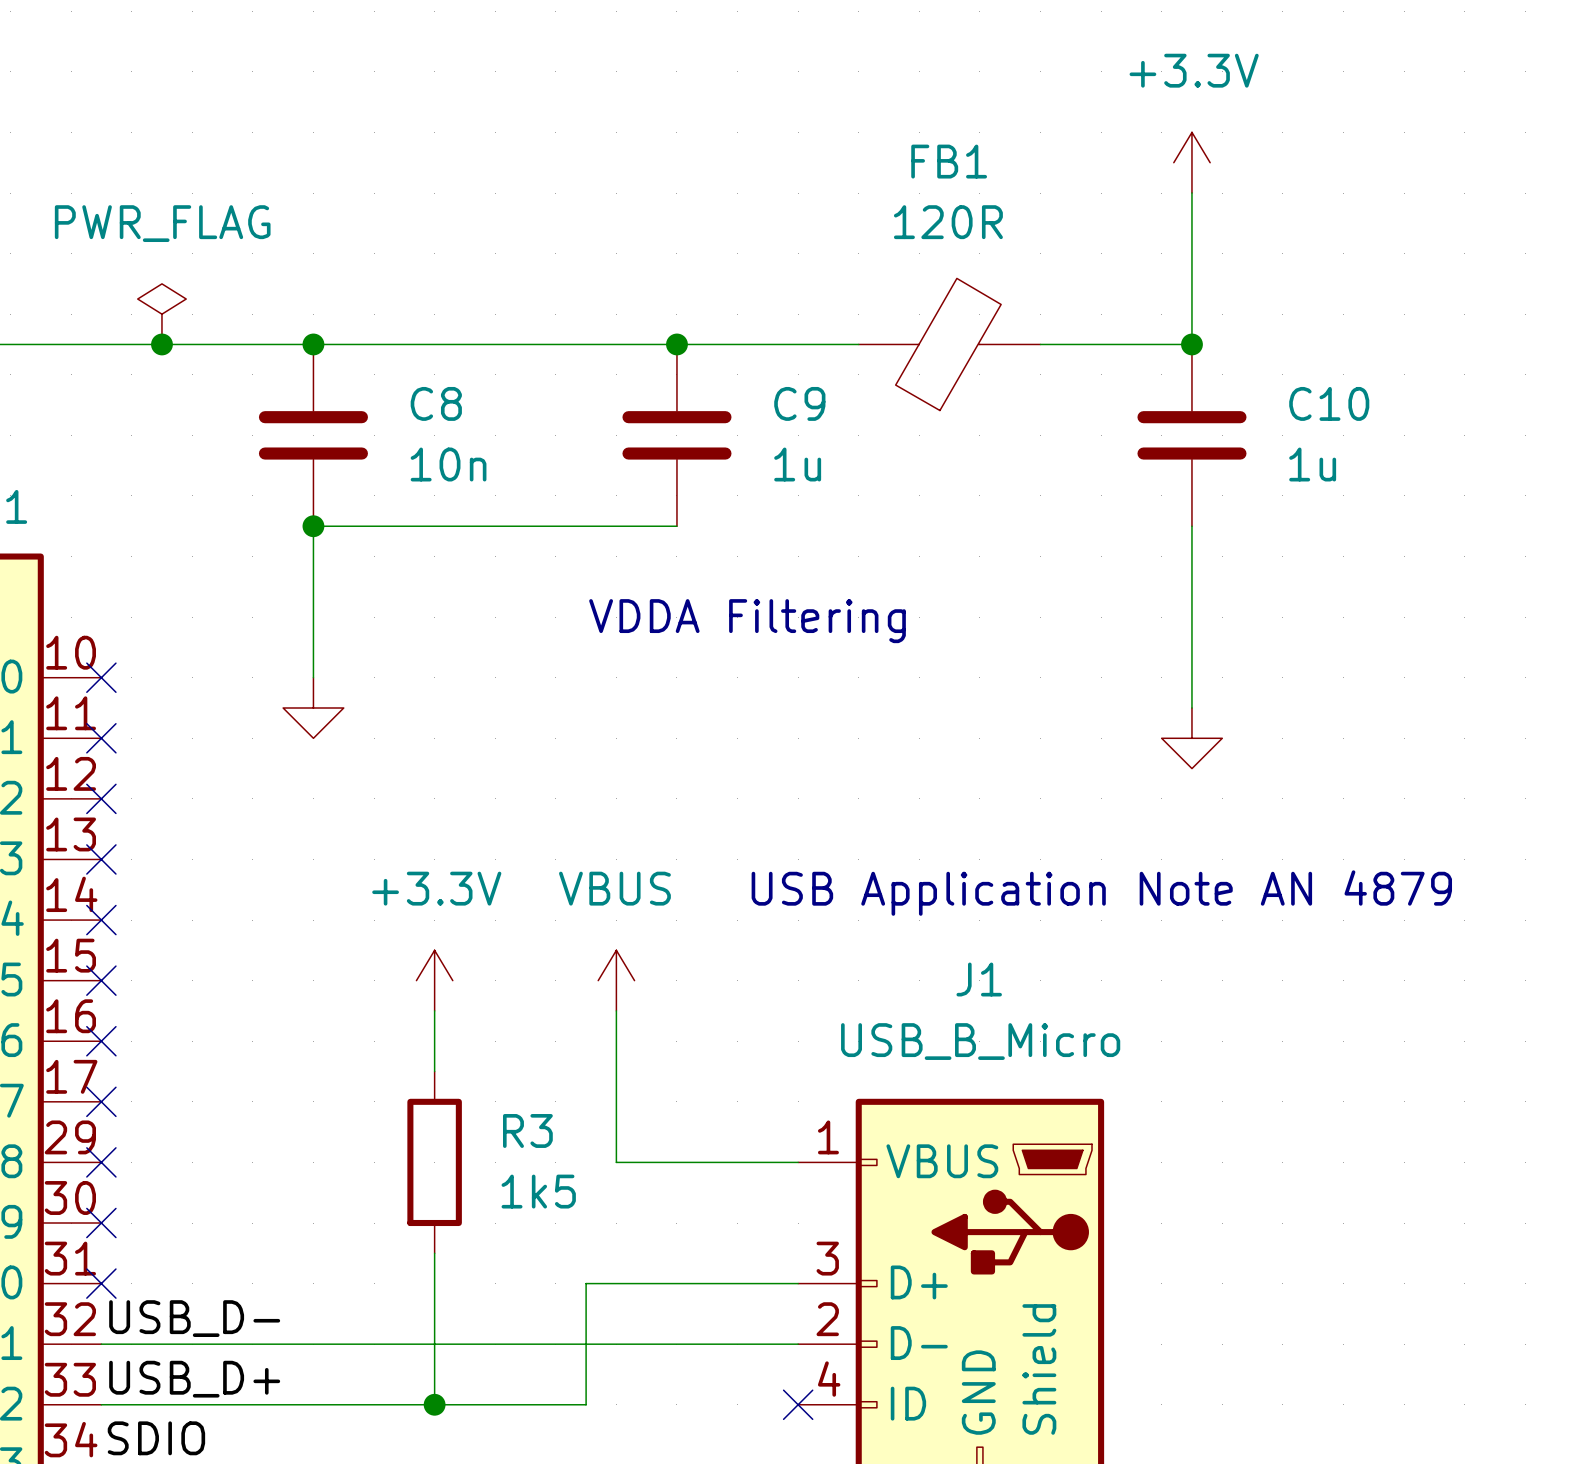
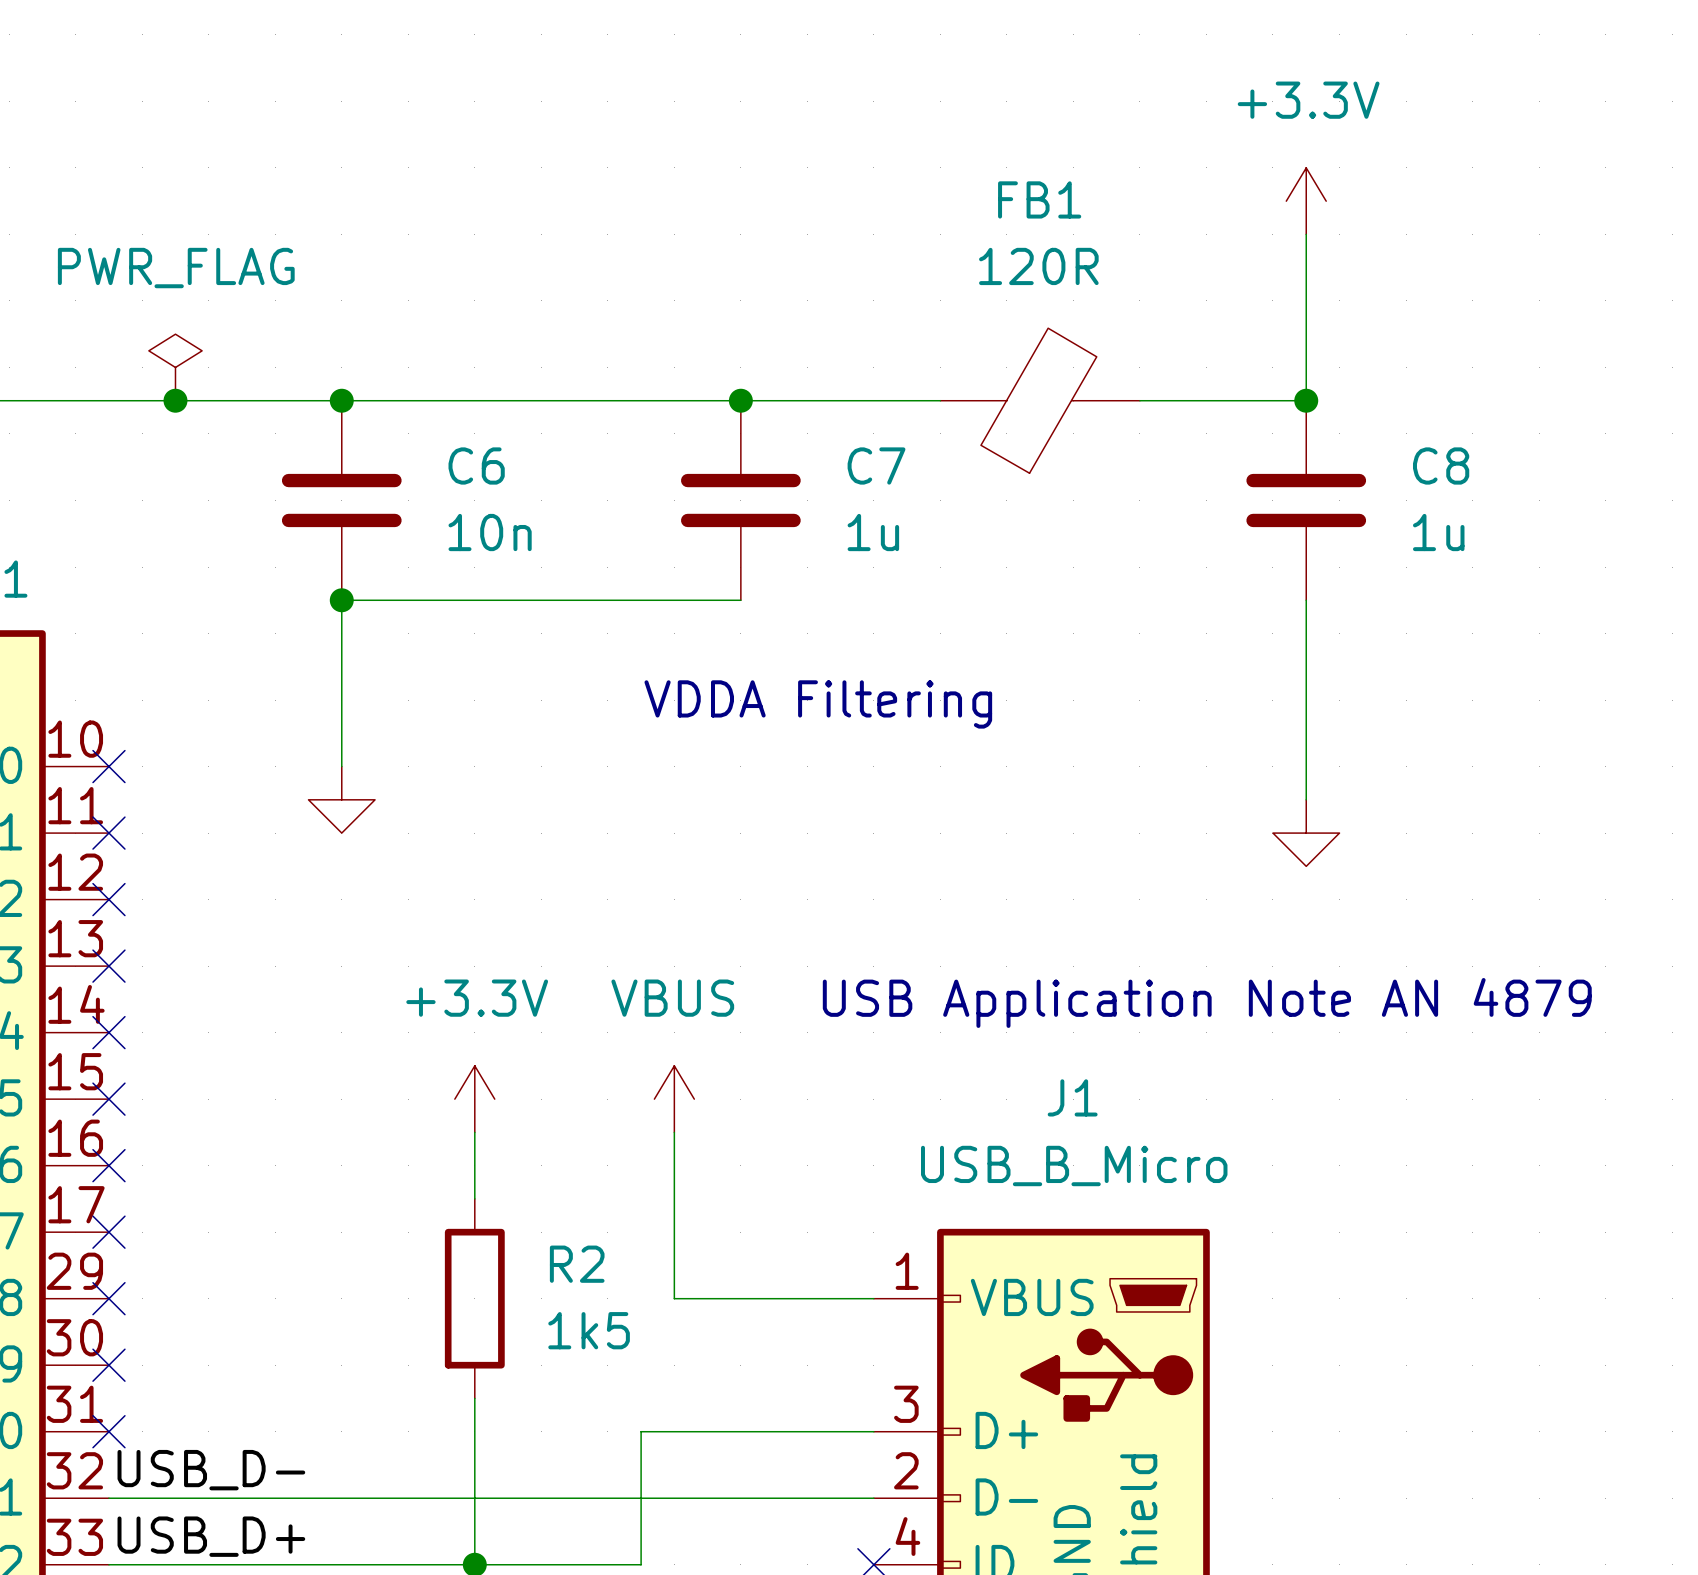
C8 name: C8 (436, 403) -> C6 (476, 466)
C9 name: C9 (799, 403) -> C7 (876, 466)
C10 name: C10 (1329, 403) -> C8 (1441, 466)
R3 name: R3 (527, 1130) -> R2 (577, 1264)

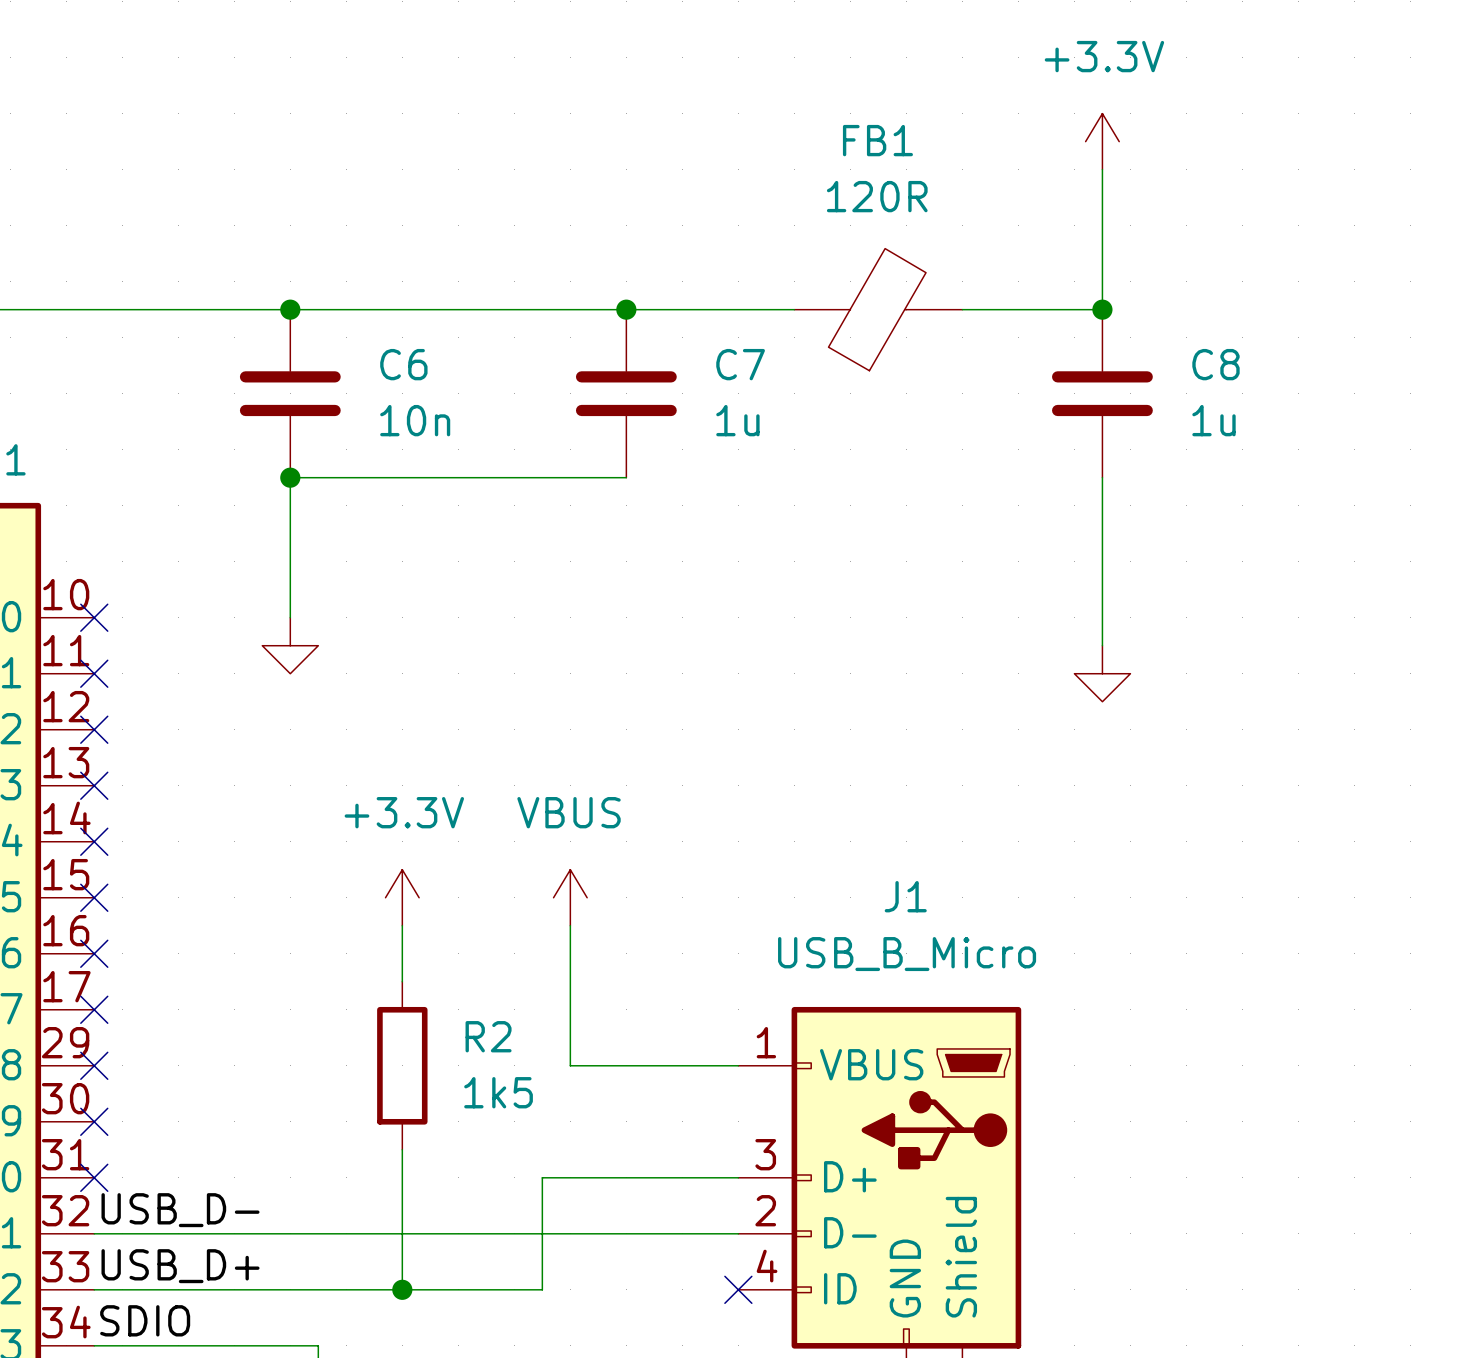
power symbol: PWR_FLAG (175, 367) -> none
junction: (175, 400) -> none
text: VDDA Filtering (818, 704) -> none
text: USB Application Note AN 4879 (1207, 1002) -> none

